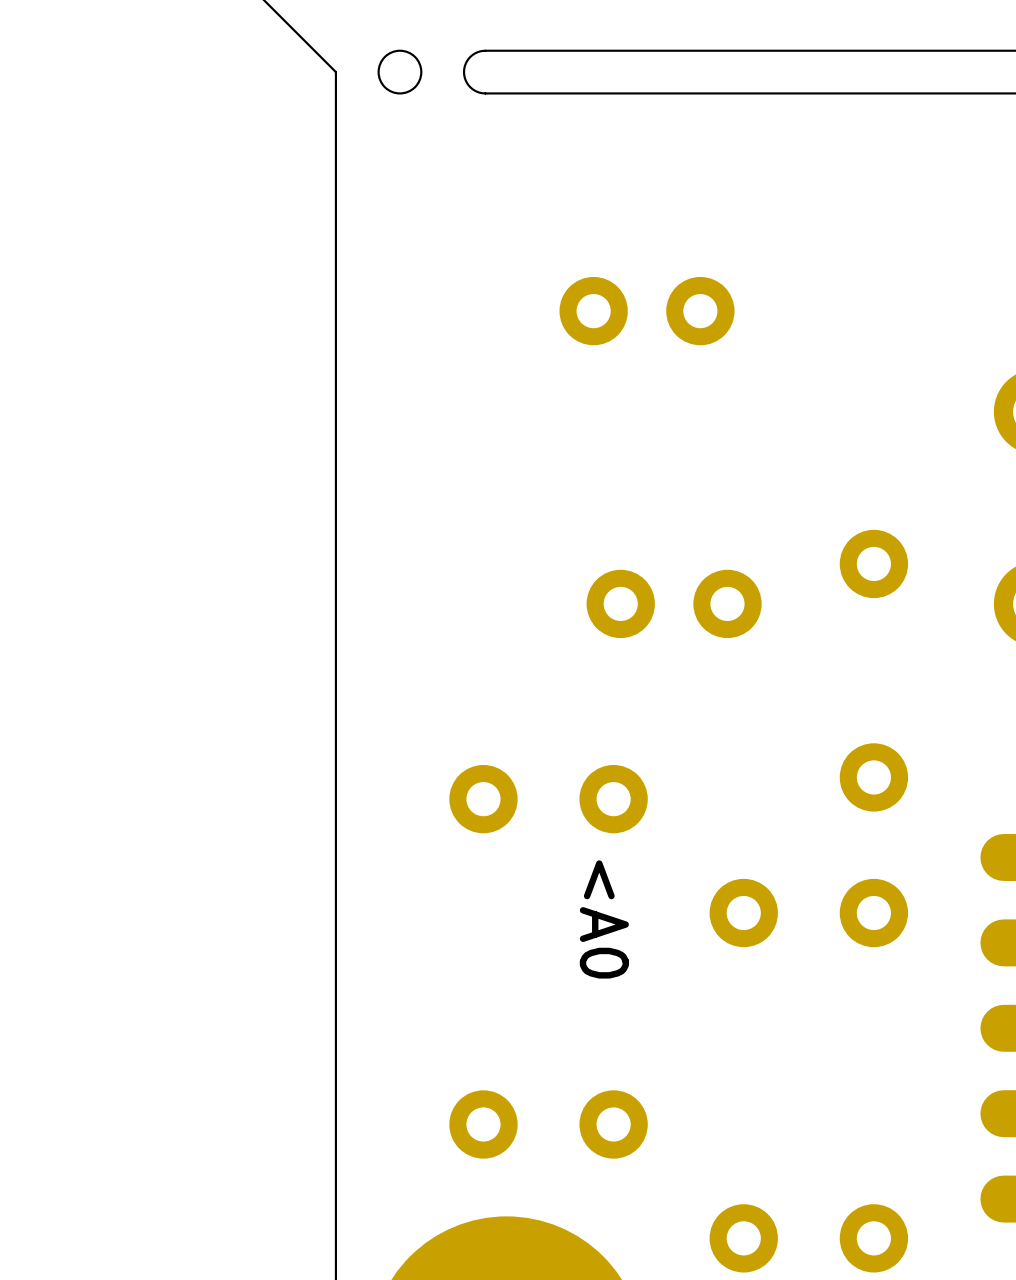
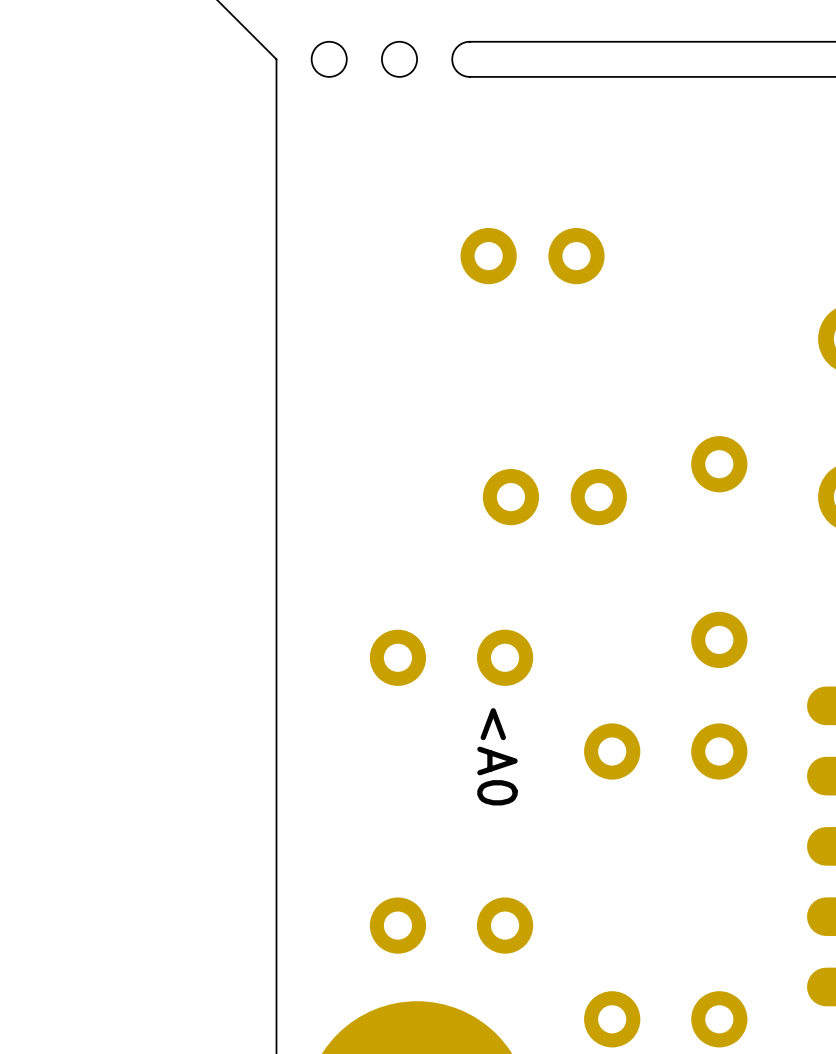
round board edge: none -> [381, 40, 418, 78]
board edge: (570, 50) (479, 51) (468, 59) (464, 72) (468, 85) (479, 92) (570, 93) -> (469, 41) (457, 46) (452, 59) (457, 71) (469, 76)

